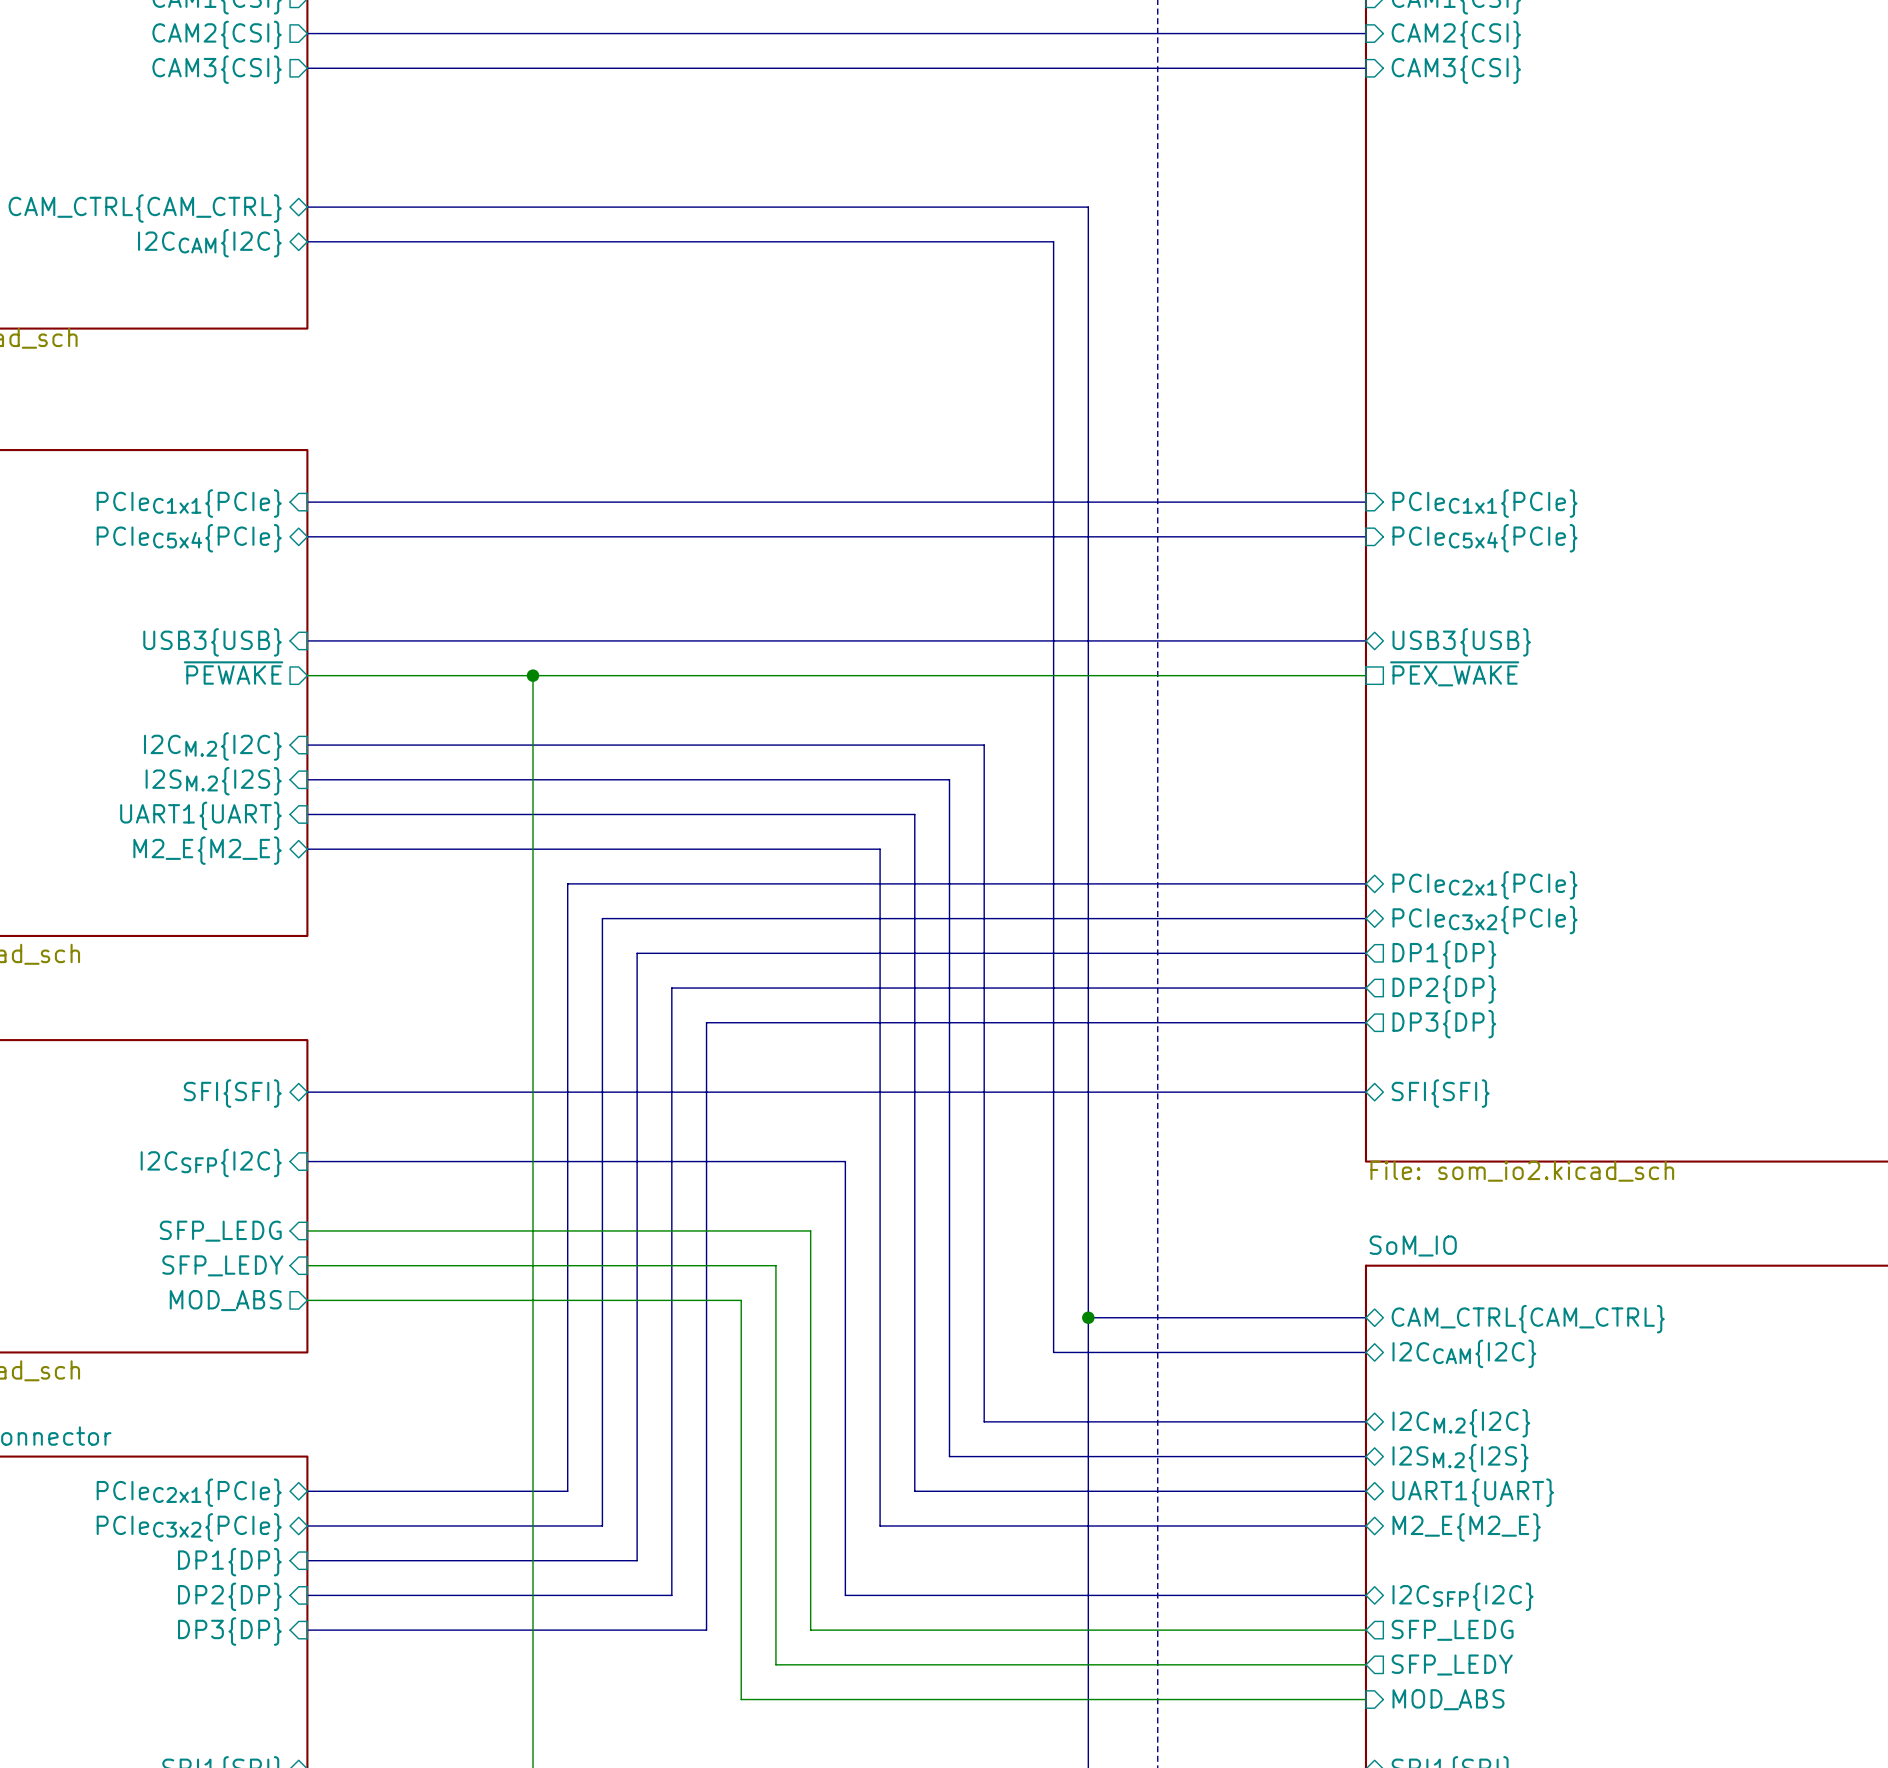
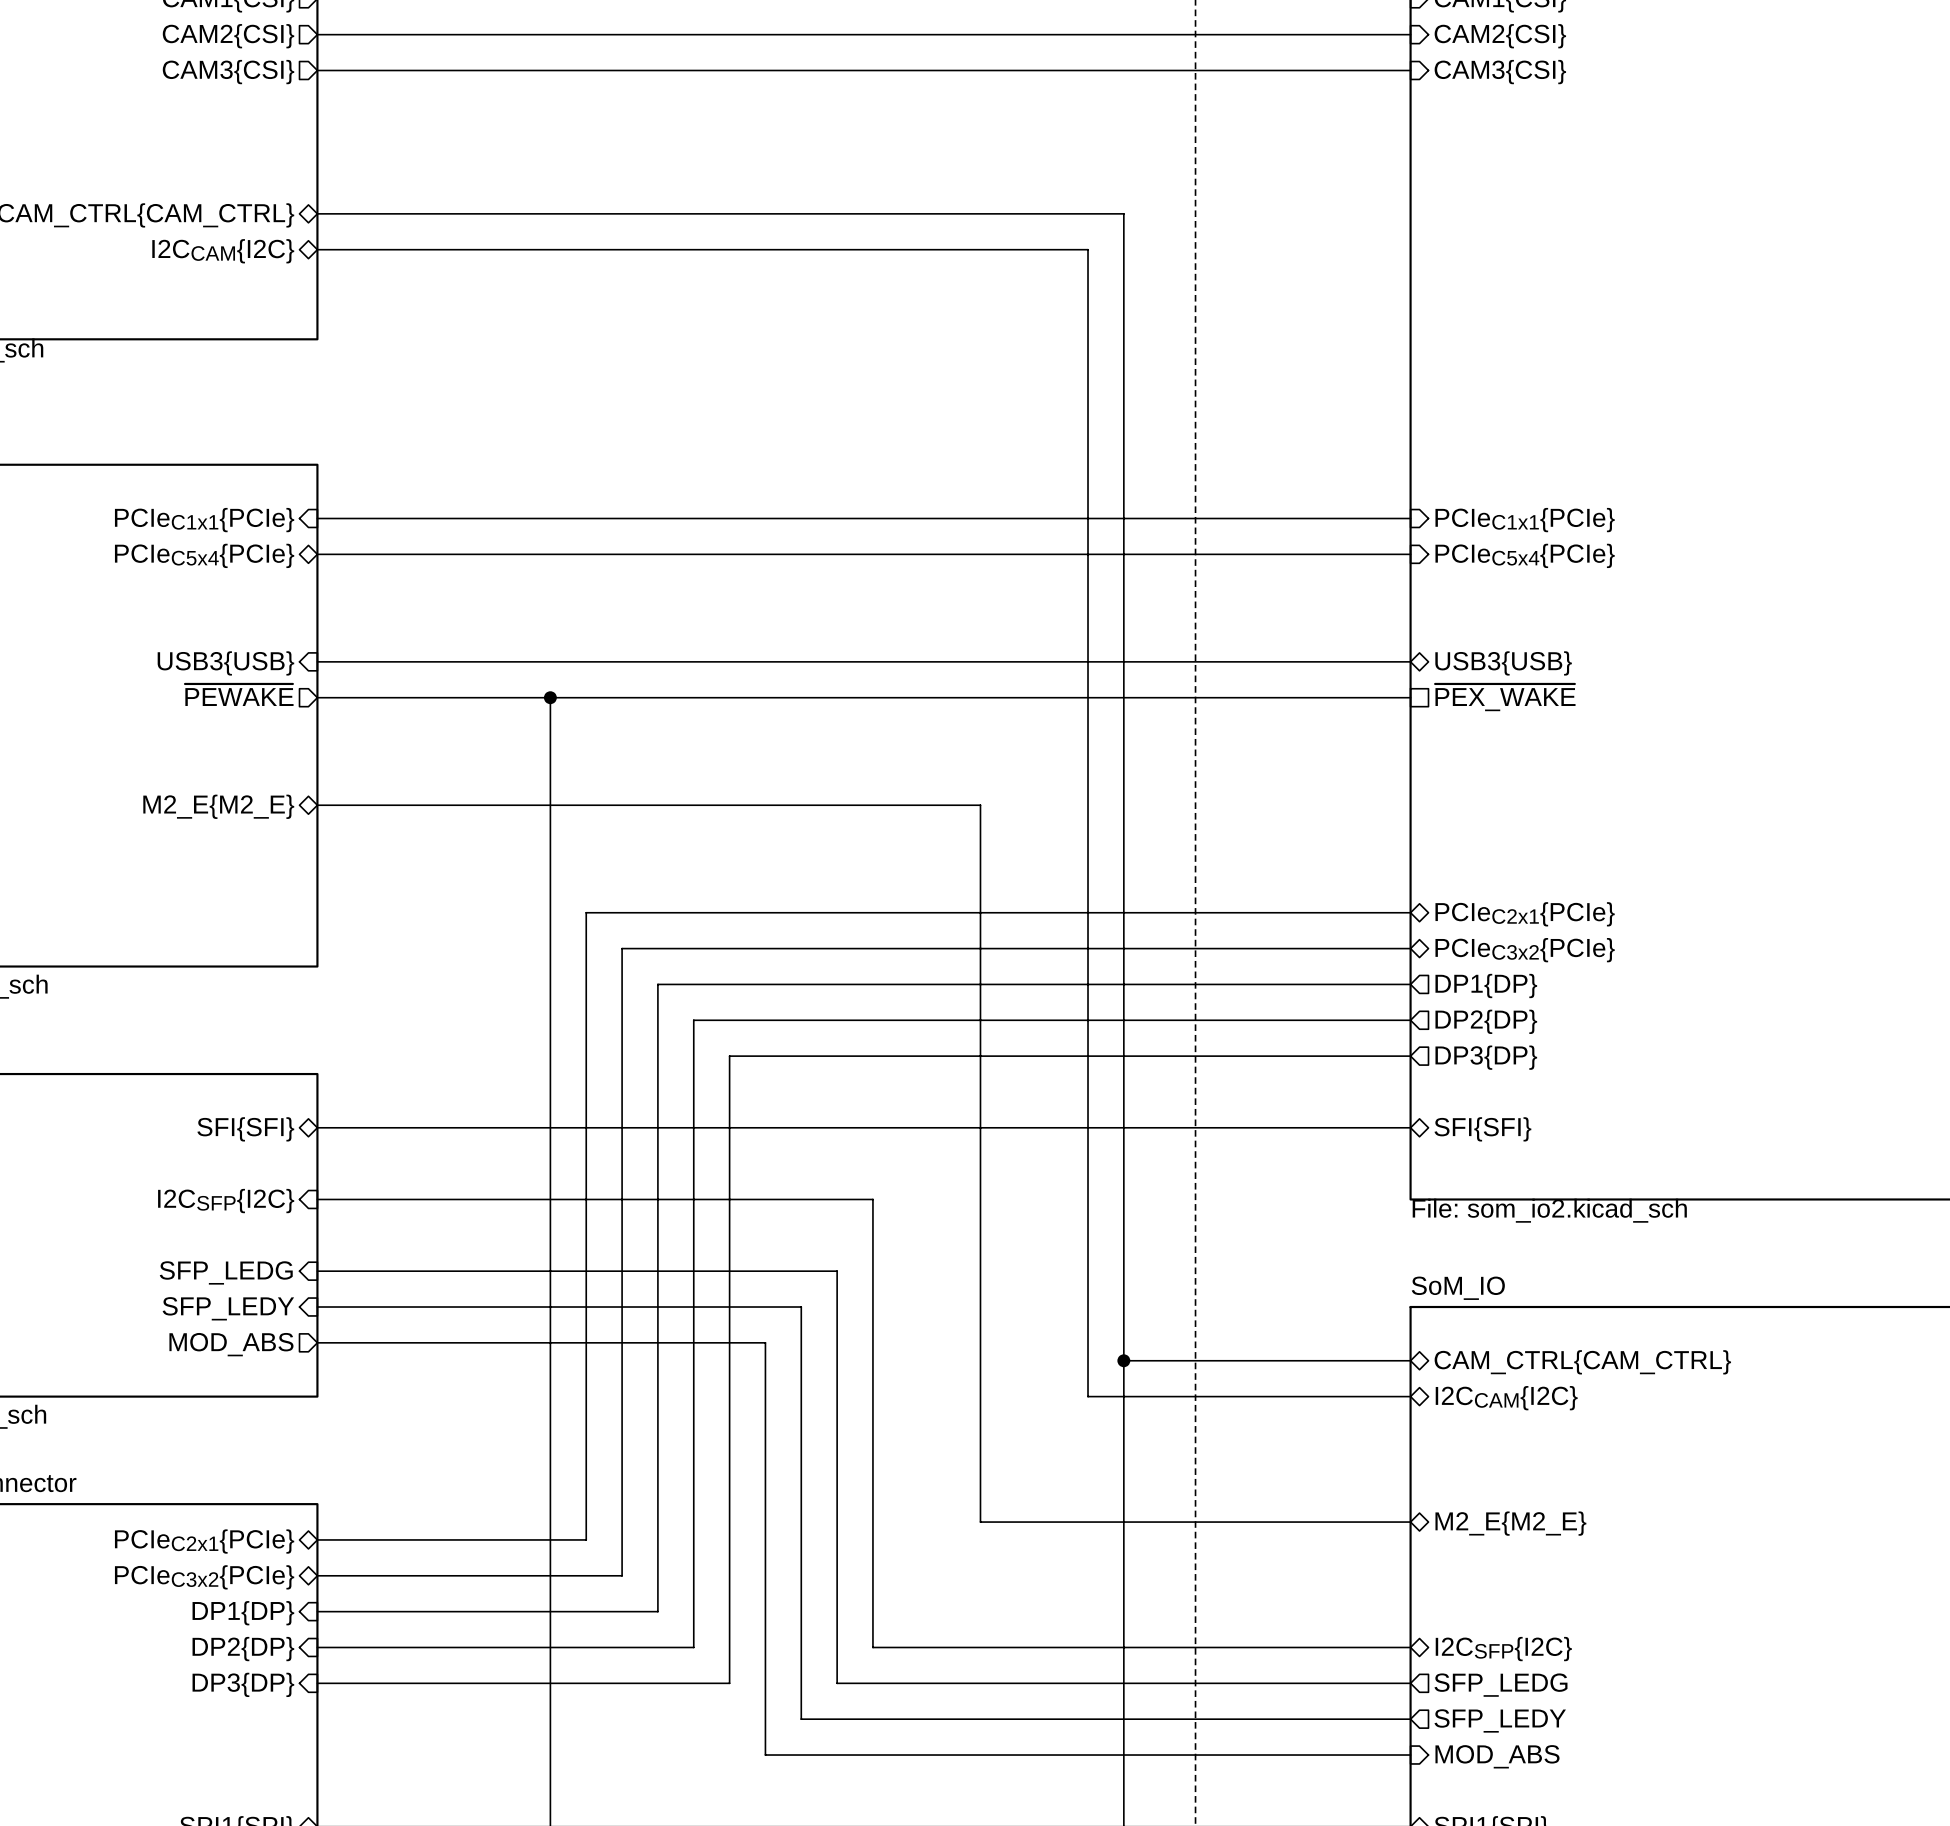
bus: (307, 745) (984, 745) (984, 1421) (1365, 1421) -> none
sheet pin: I2CM.2{I2C} (212, 746) -> none
sheet pin shape: input (213, 781) -> bidirectional (218, 806)
sheet pin: I2SM.2{I2S} (213, 781) -> M2_E{M2_E} (218, 806)
bus: (307, 814) (914, 814) (914, 1491) (1365, 1491) -> none
sheet pin: UART1{UART} (200, 815) -> none
bus: (307, 849) (880, 849) (880, 1525) (1365, 1525) -> none
sheet pin: M2_E{M2_E} (207, 850) -> none
sheet pin: I2CM.2{I2C} (1461, 1423) -> none
bus: (949, 1456) (1365, 1456) -> (980, 1504) (980, 1522) (1410, 1522)
sheet pin: I2SM.2{I2S} (1460, 1457) -> none
sheet pin: UART1{UART} (1473, 1492) -> none
sheet pin position: M2_E{M2_E} (1466, 1527) -> M2_E{M2_E} (1510, 1523)

